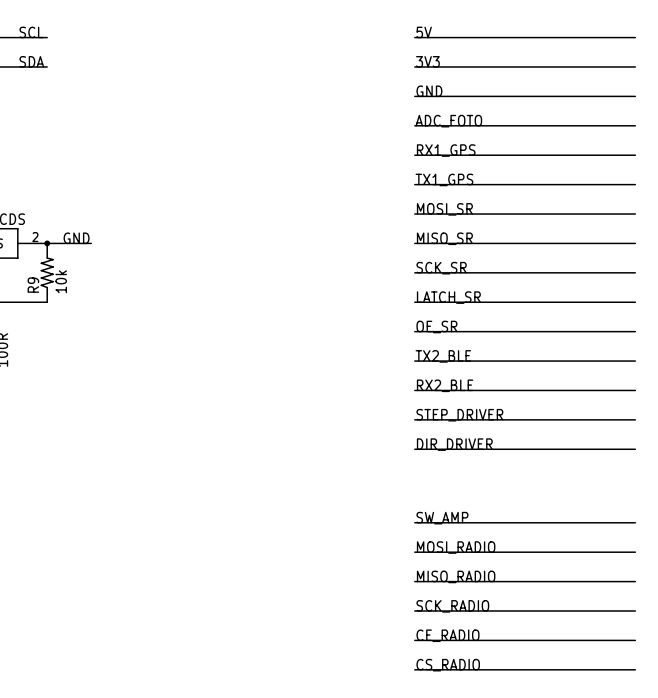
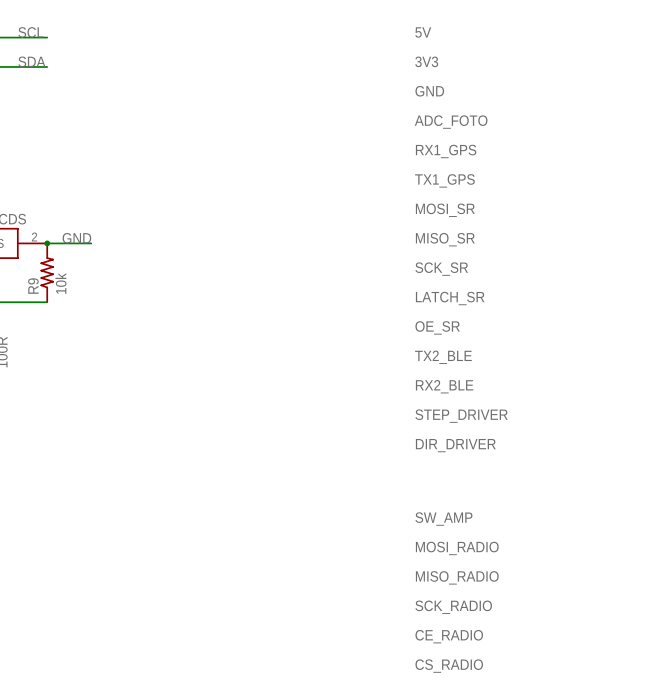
wire: (414, 37) (635, 37) -> none
wire: (414, 66) (635, 66) -> none
wire: (414, 96) (635, 96) -> none
wire: (414, 125) (635, 125) -> none
wire: (414, 155) (635, 155) -> none
wire: (414, 184) (635, 184) -> none
wire: (414, 214) (635, 214) -> none
wire: (414, 243) (635, 243) -> none
wire: (414, 272) (635, 272) -> none
wire: (414, 302) (635, 302) -> none
wire: (414, 331) (635, 331) -> none
wire: (414, 361) (635, 361) -> none
wire: (414, 390) (635, 390) -> none
wire: (414, 419) (635, 419) -> none
wire: (414, 449) (635, 449) -> none
wire: (414, 522) (635, 522) -> none
wire: (414, 552) (635, 552) -> none
wire: (414, 581) (635, 581) -> none
wire: (414, 611) (635, 611) -> none
wire: (414, 640) (635, 640) -> none
wire: (414, 669) (635, 669) -> none

